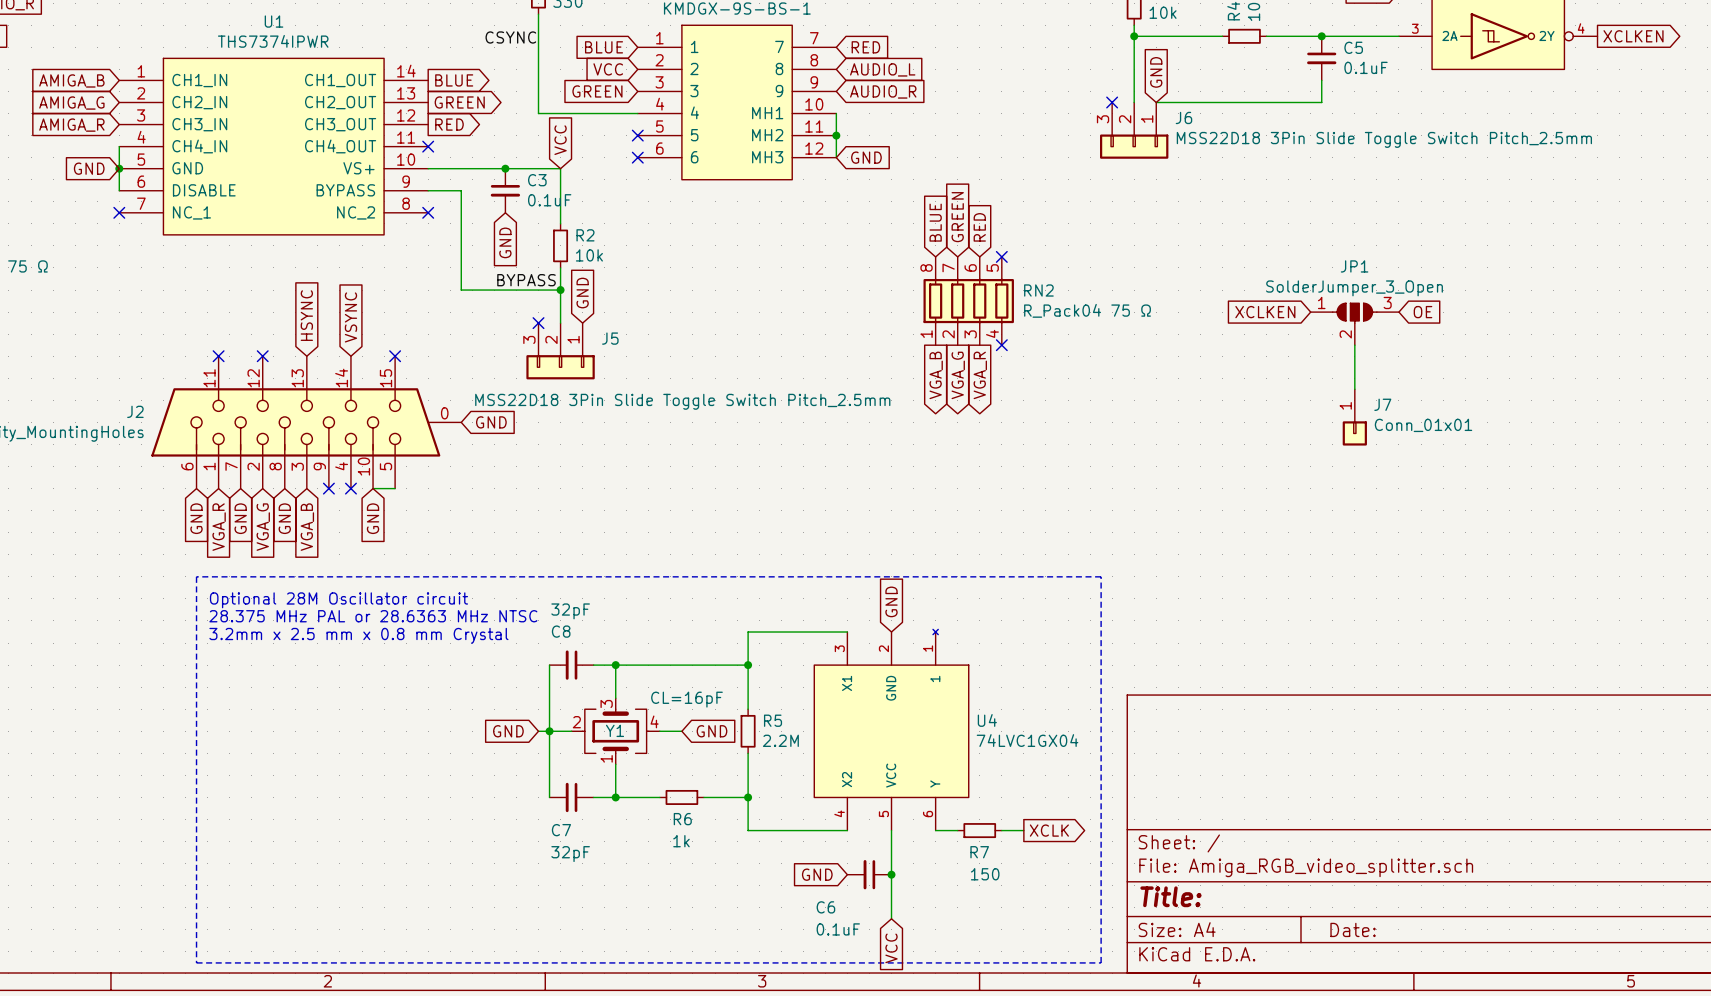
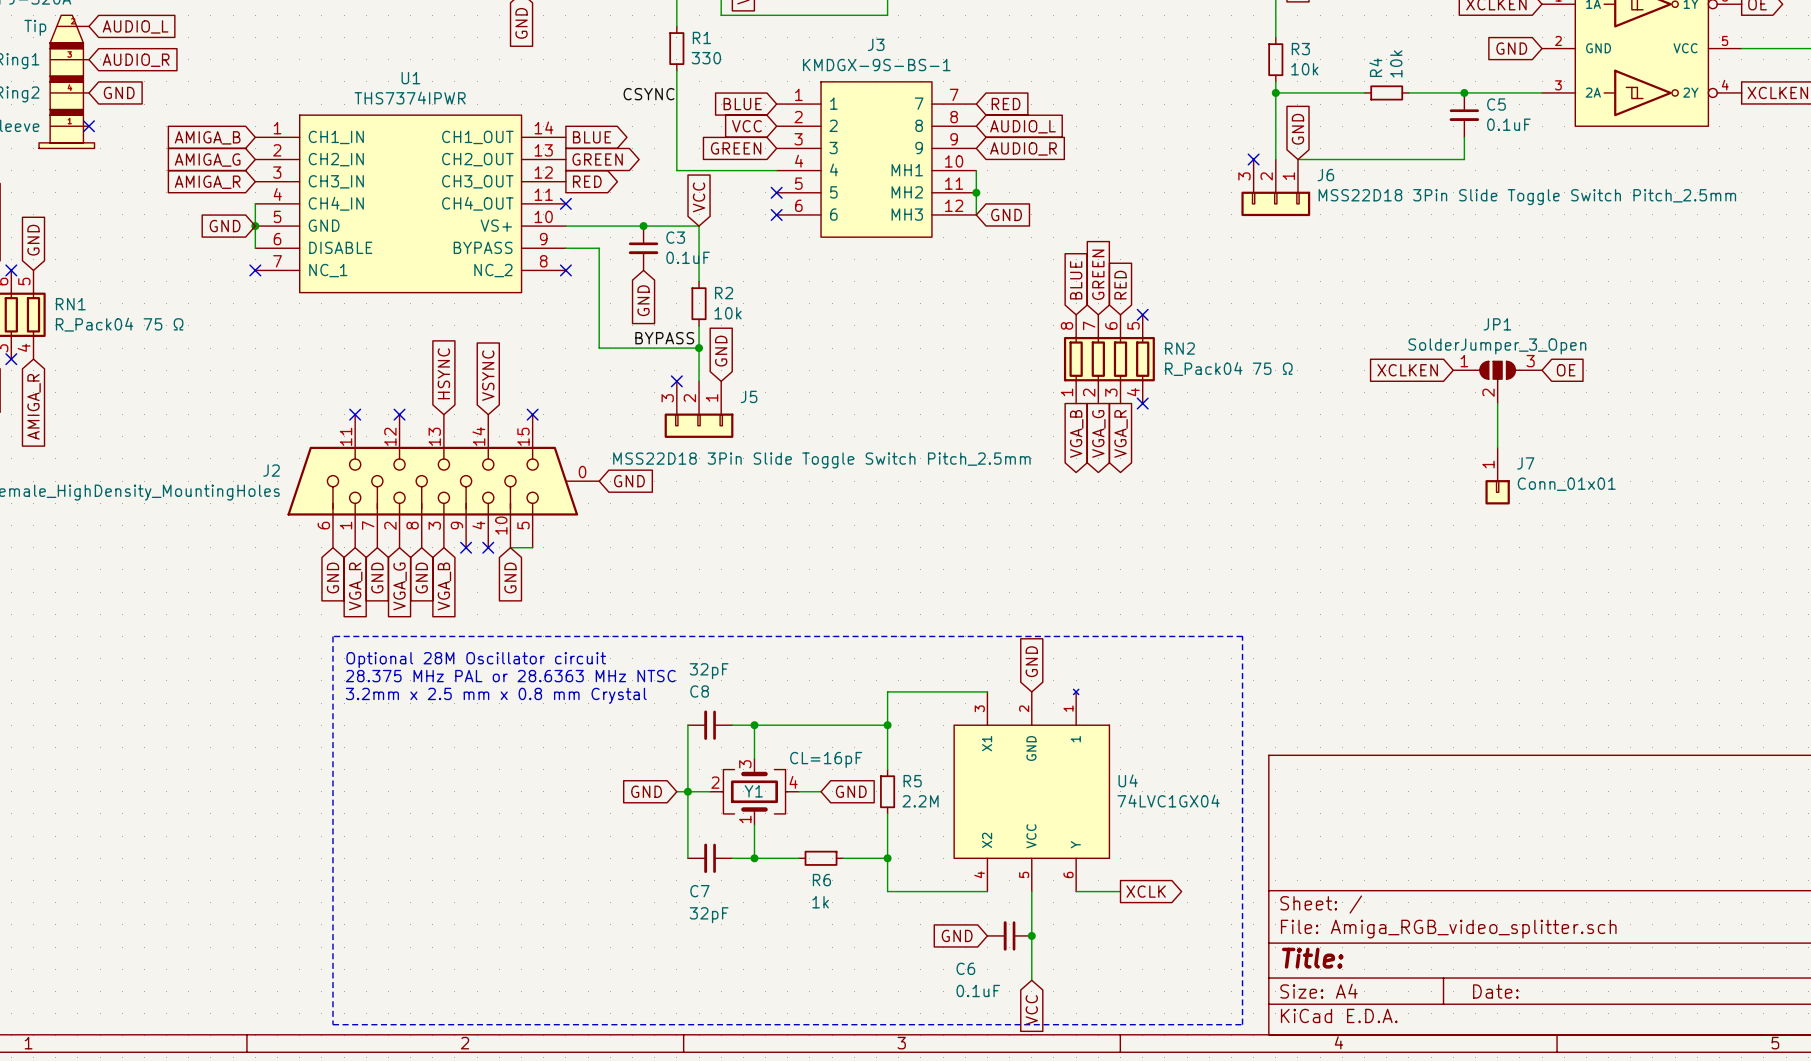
R7: 150 (979, 830) -> none
wire: (1001, 830) (1023, 830) -> (1098, 891) (1120, 891)
global label position: XCLK (1049, 830) -> XCLK (1146, 891)

